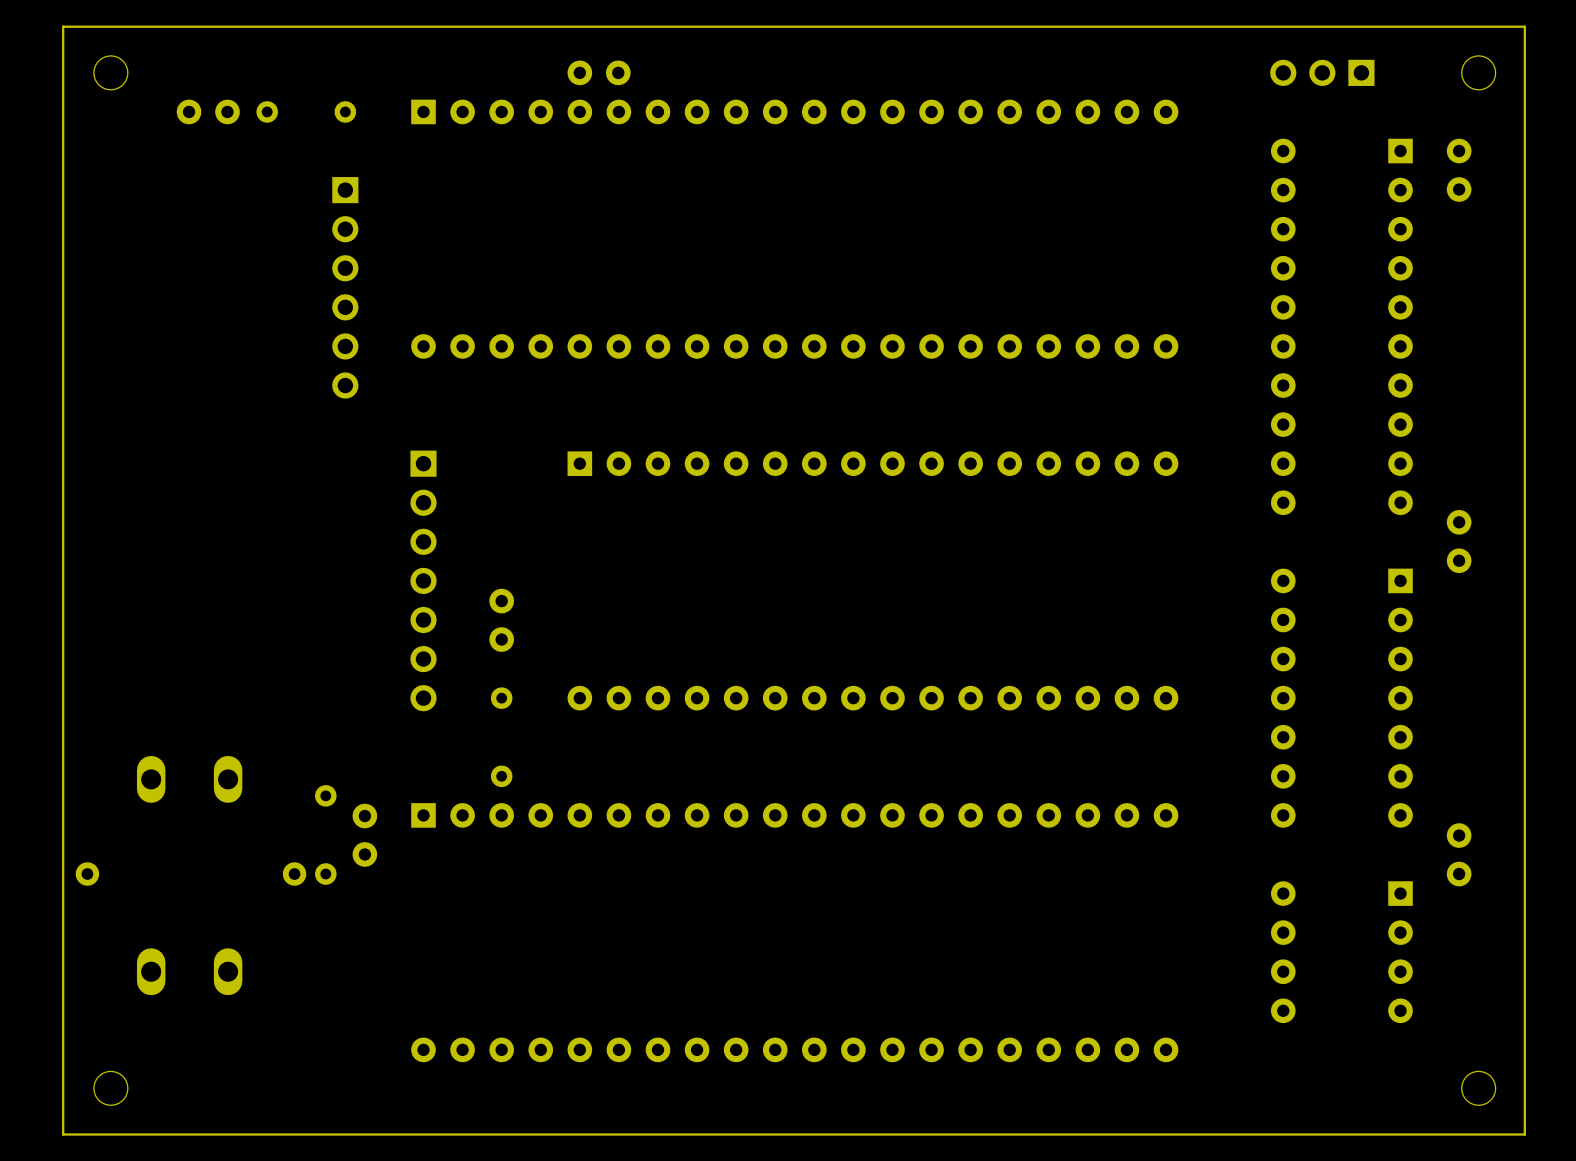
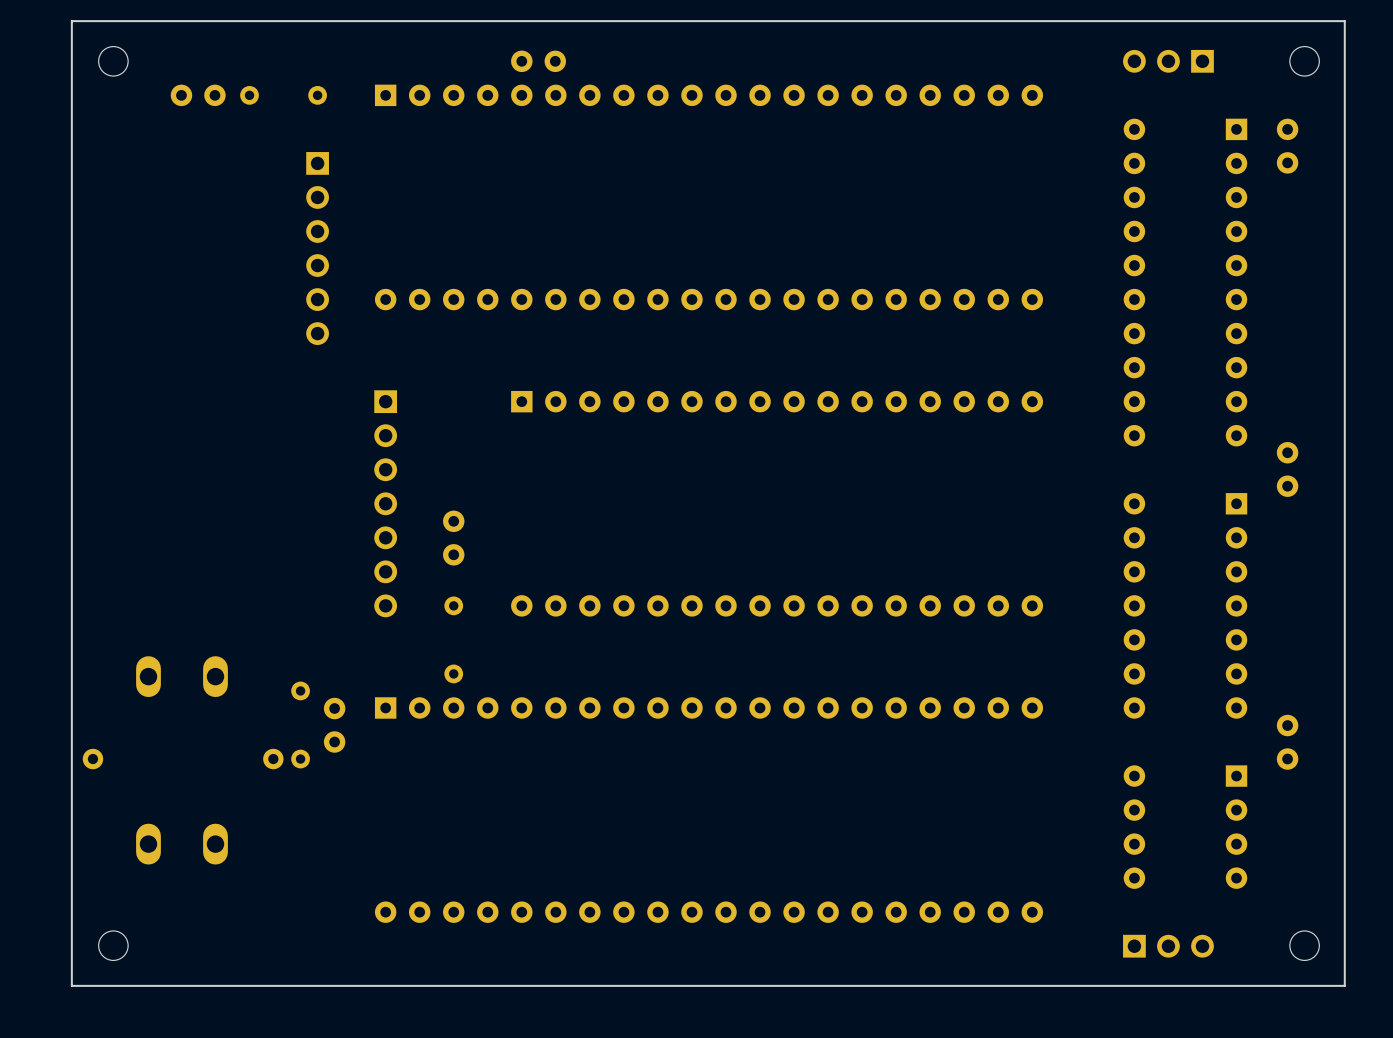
part: none -> (1168, 946)

